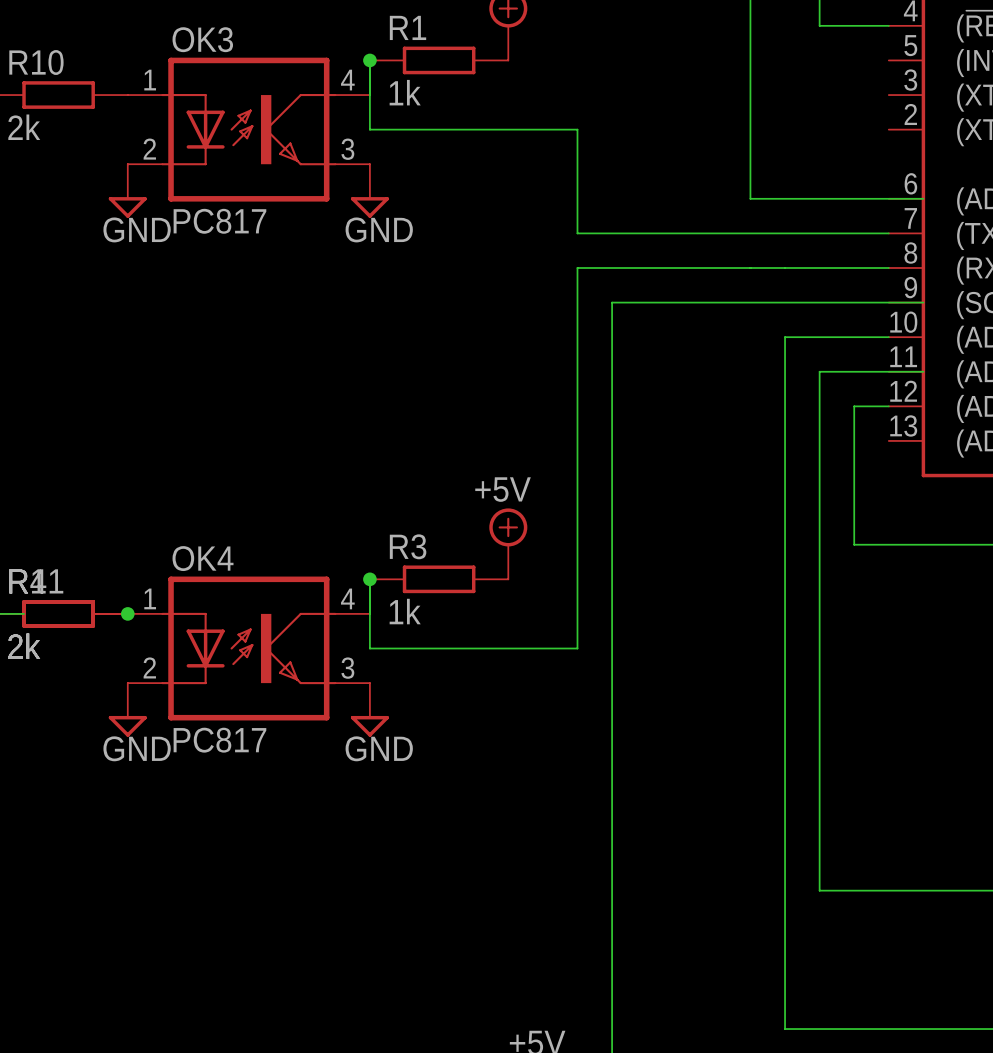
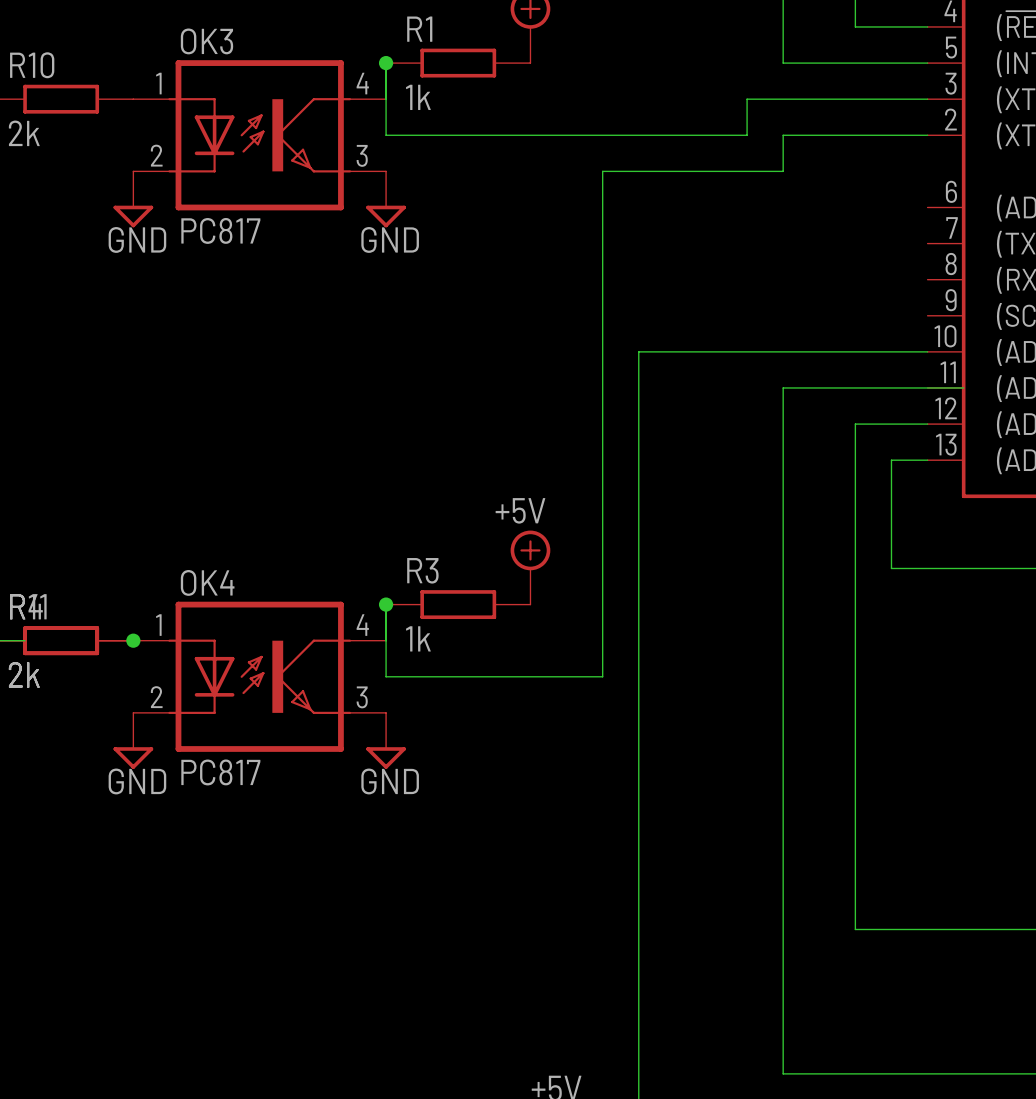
wire: (750, 60) (750, 129) -> (783, 63) (927, 63)
wire: none -> (927, 99) (747, 99) (747, 135) (602, 135)
wire: (577, 129) (577, 164) -> (783, 171) (602, 171)
wire: none -> (783, 135) (927, 135)
wire: (750, 164) (750, 198) (923, 198) -> none
wire: (577, 233) (888, 233) -> (602, 243) (602, 279)
wire: (577, 267) (888, 267) -> none
wire: (923, 302) (612, 302) (612, 337) -> (819, 351) (638, 351)
wire: (785, 337) (785, 1029) -> (855, 387) (783, 387) (783, 1073) (819, 1073)
wire: (819, 371) (819, 406) -> none
wire: (854, 406) (854, 440) -> (891, 424) (855, 424)
wire: none -> (891, 460) (927, 460)

